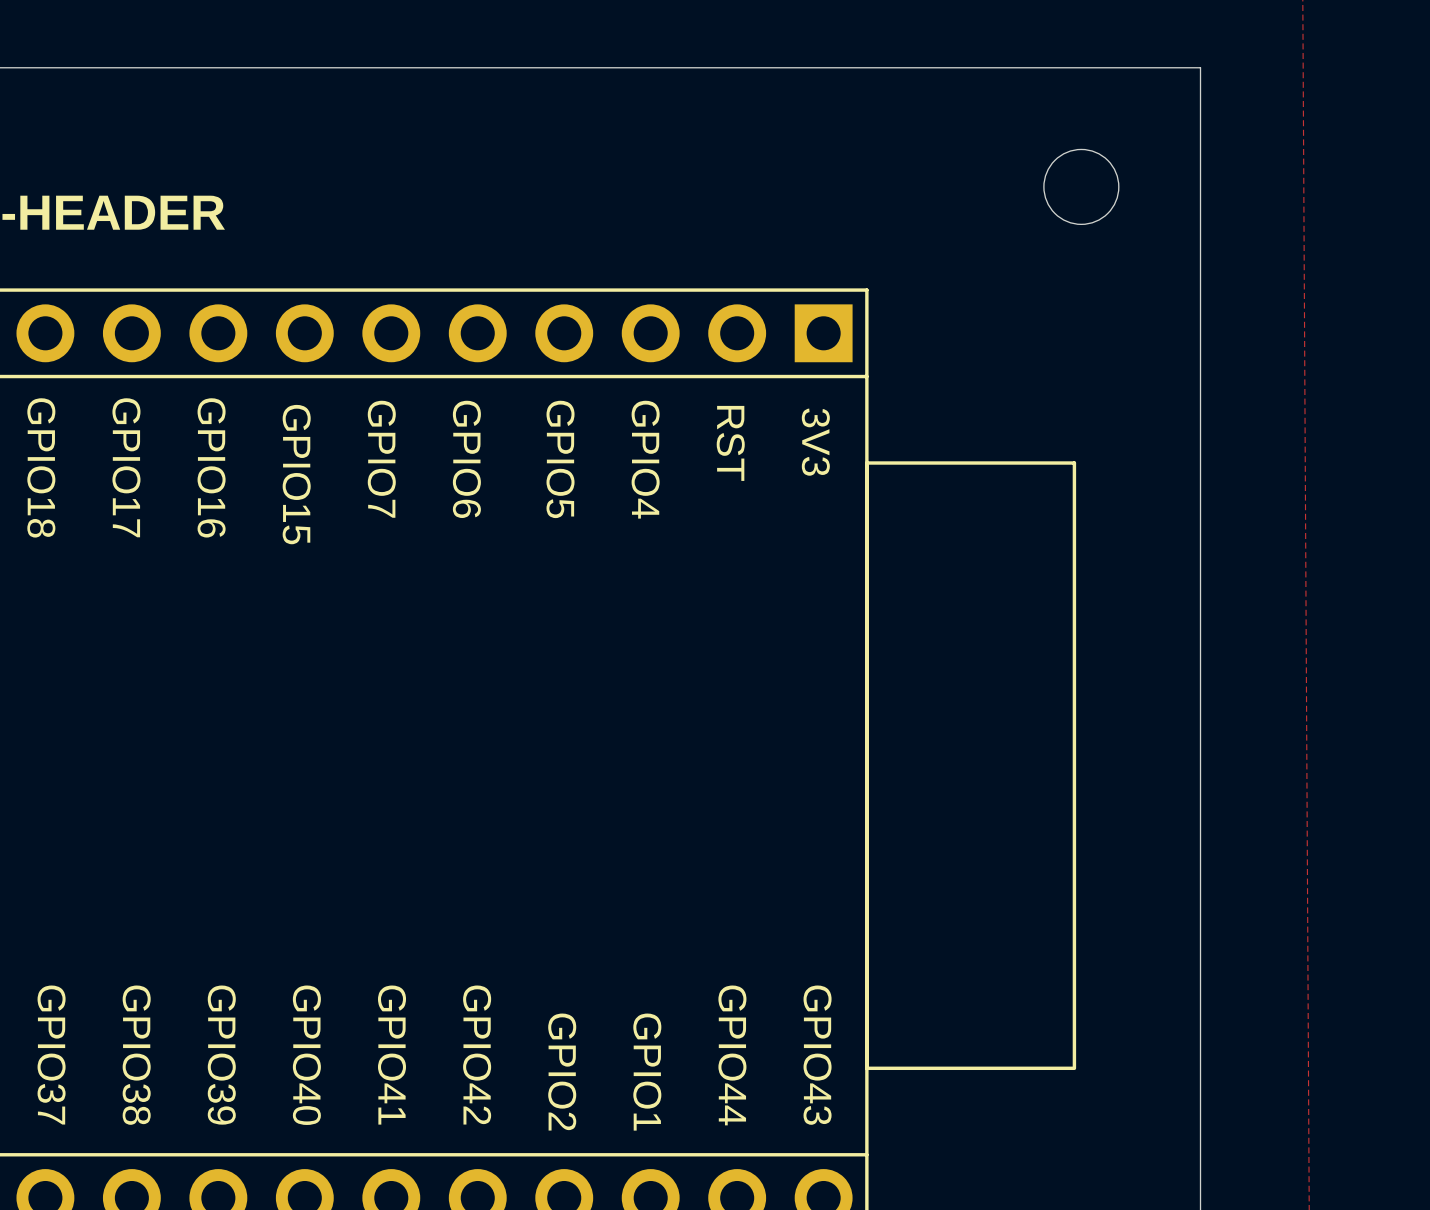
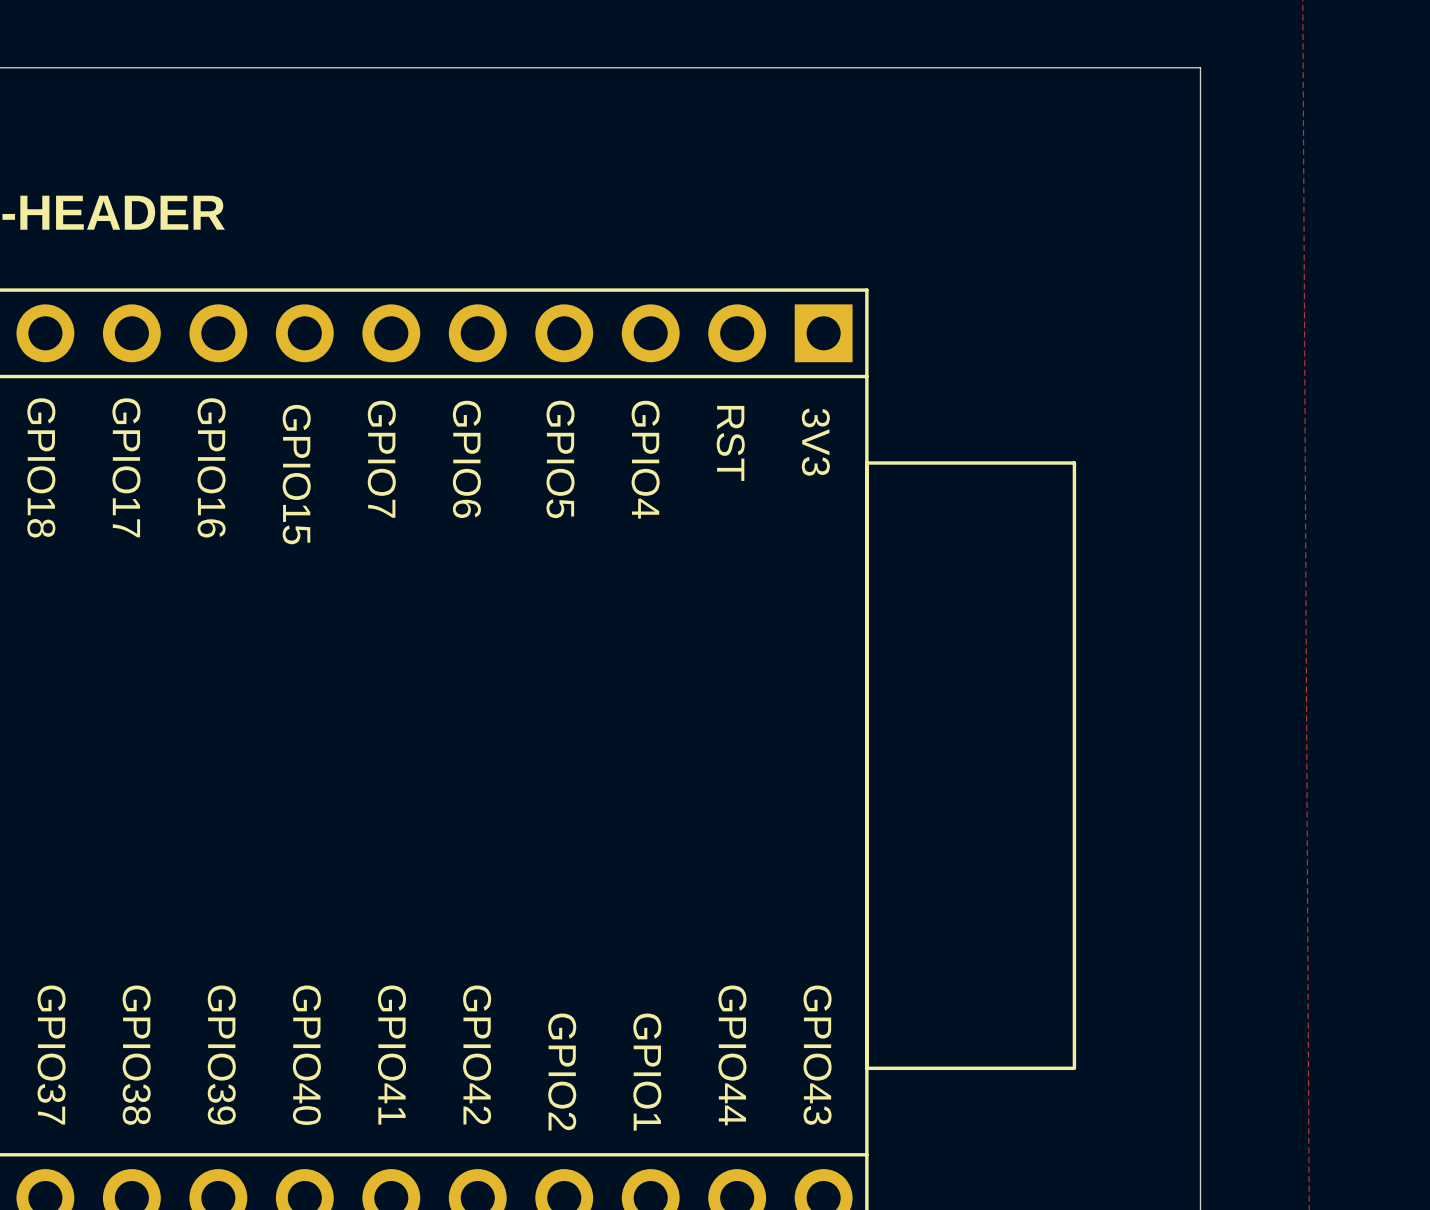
round board edge: [1043, 148, 1120, 226] -> none

